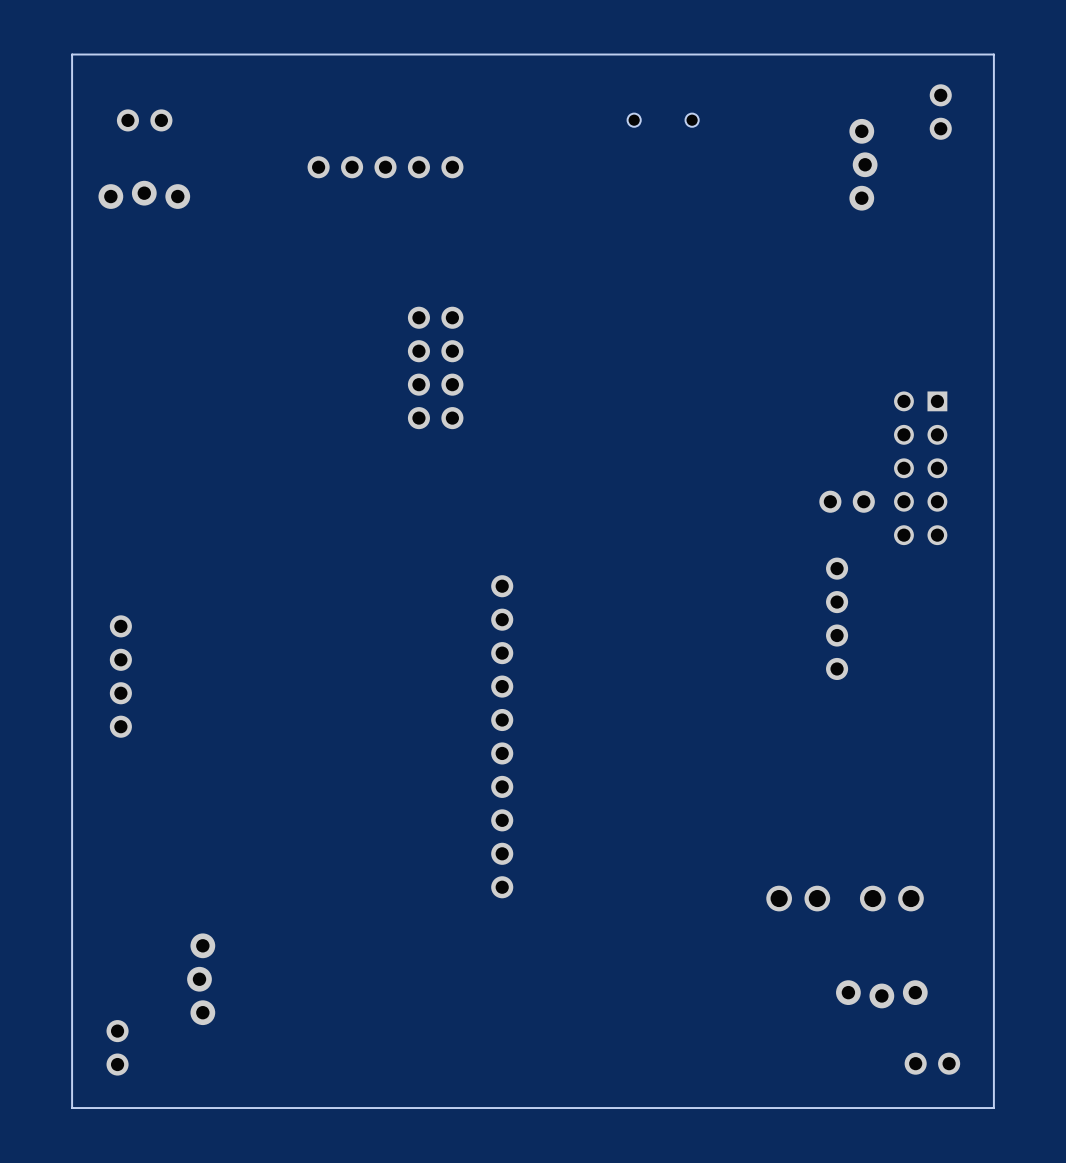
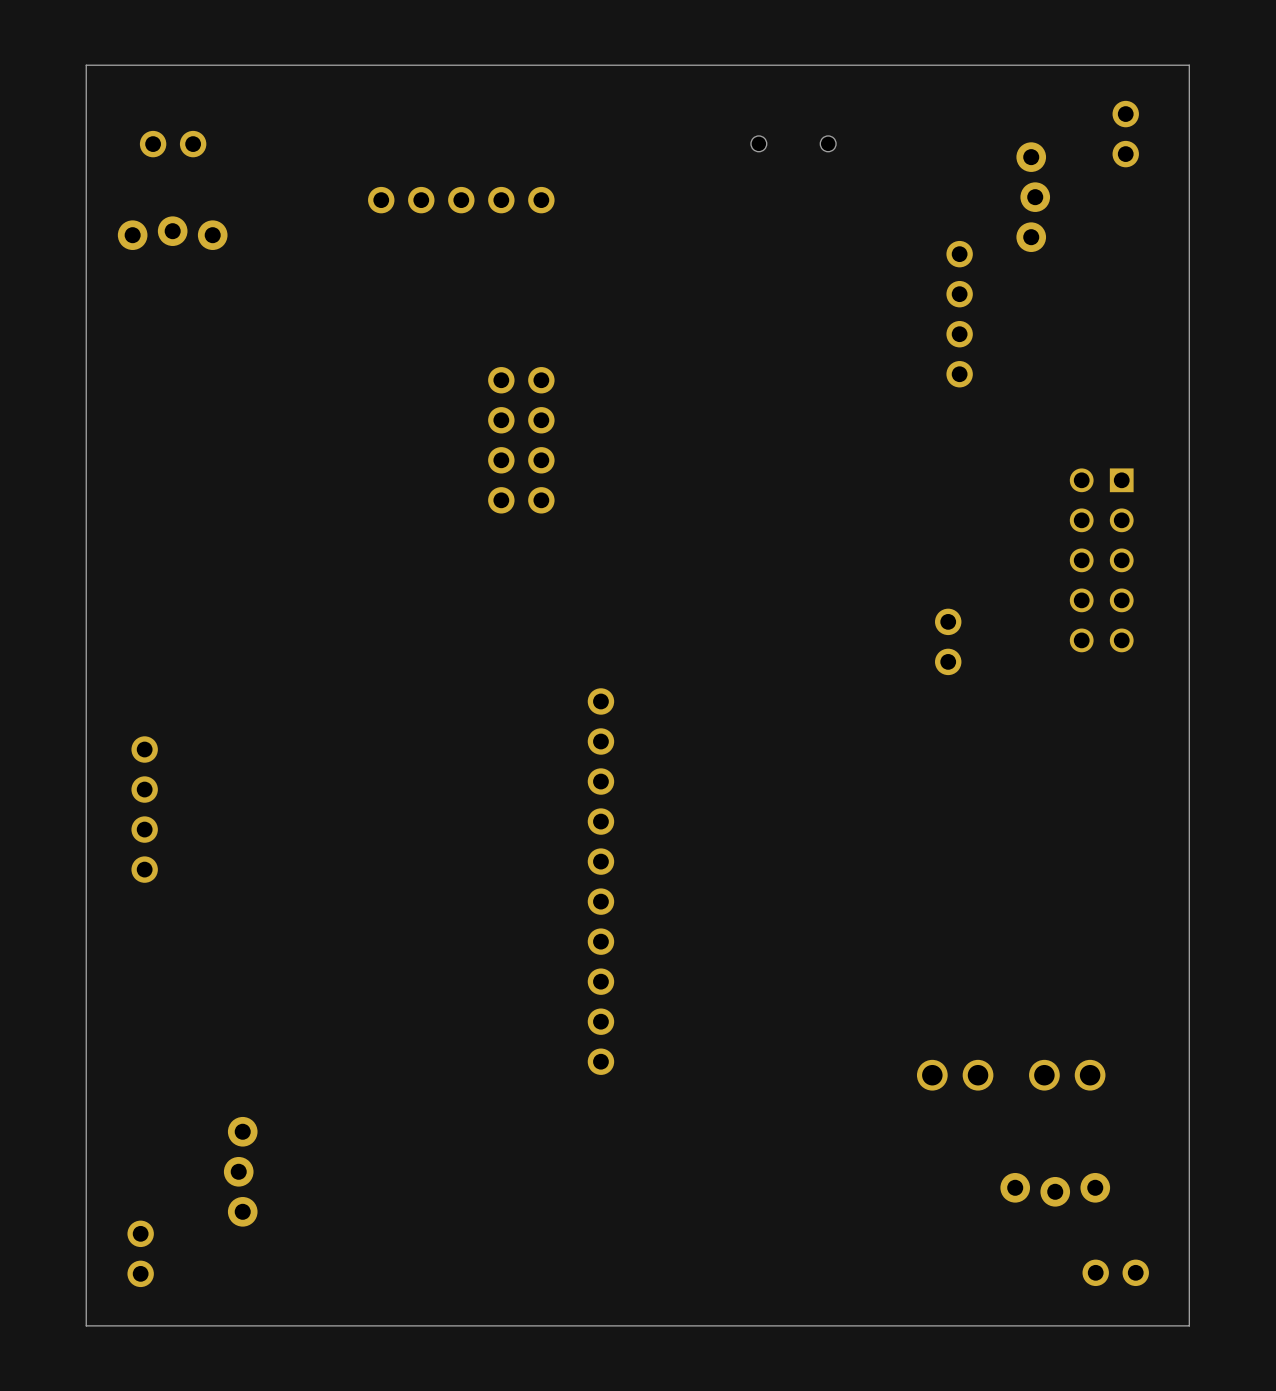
part: none -> (959, 314)
part rotation: 0° (847, 501) -> 90° clockwise (948, 641)
part position: (847, 501) -> (948, 641)
part: (837, 618) -> none

